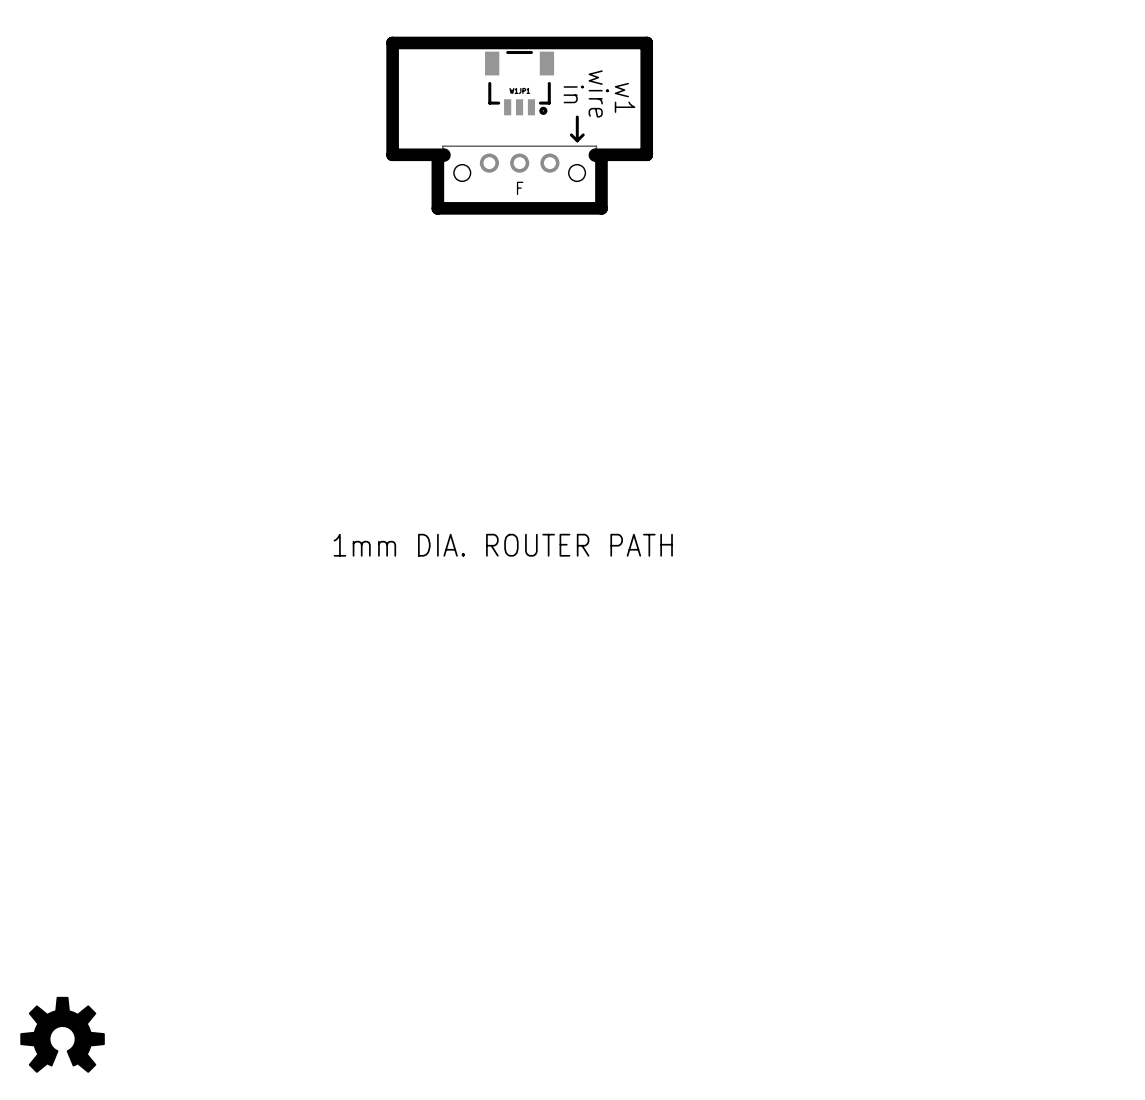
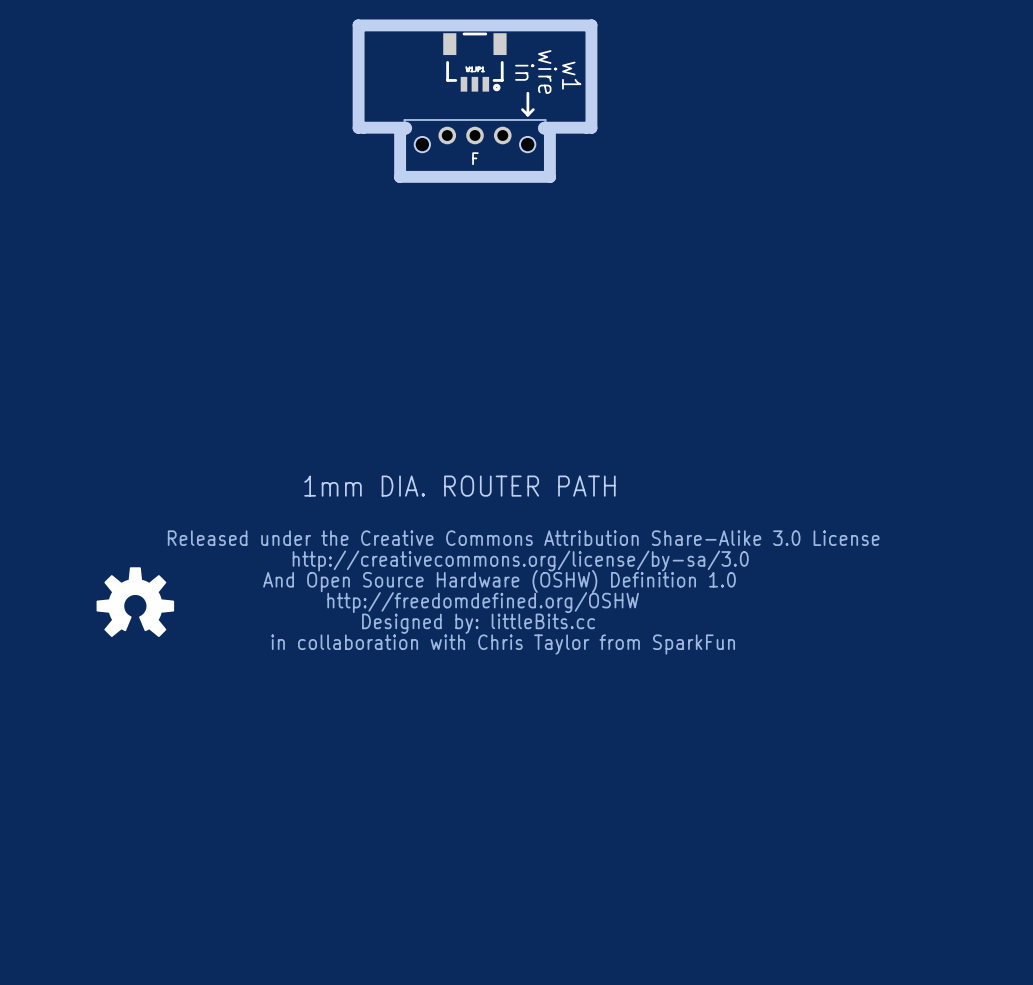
drawing: none -> [96, 567, 175, 638]
drawing: [20, 996, 105, 1073] -> none

